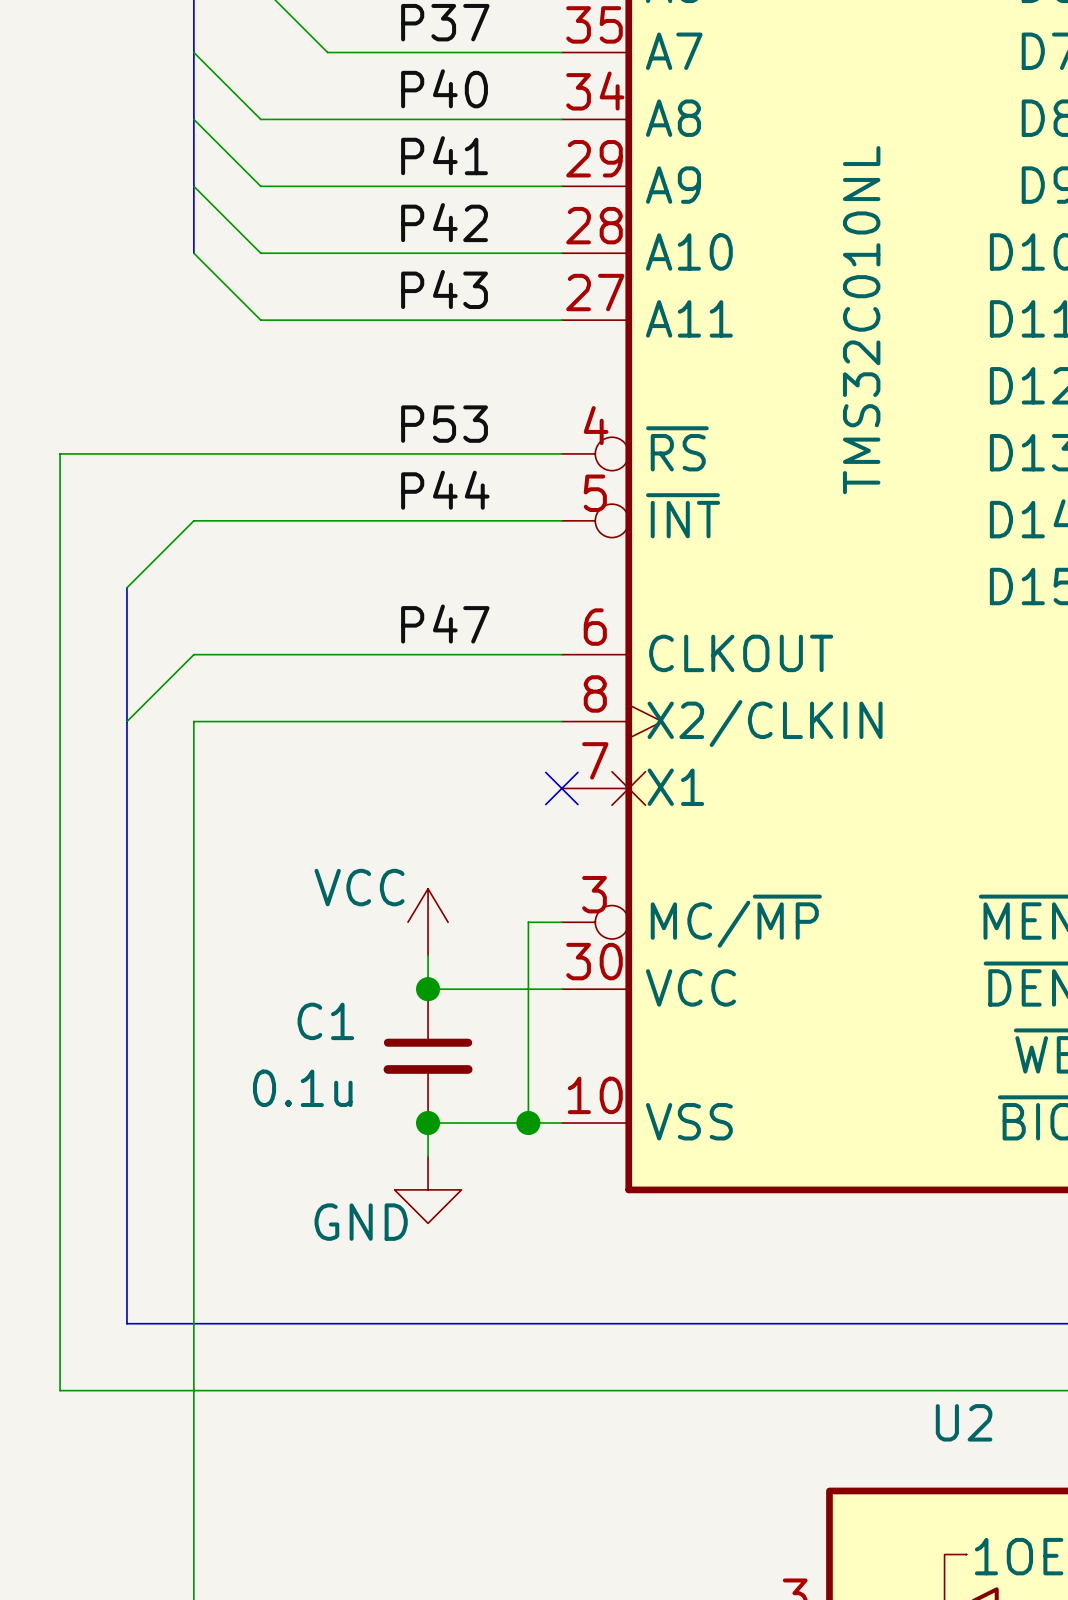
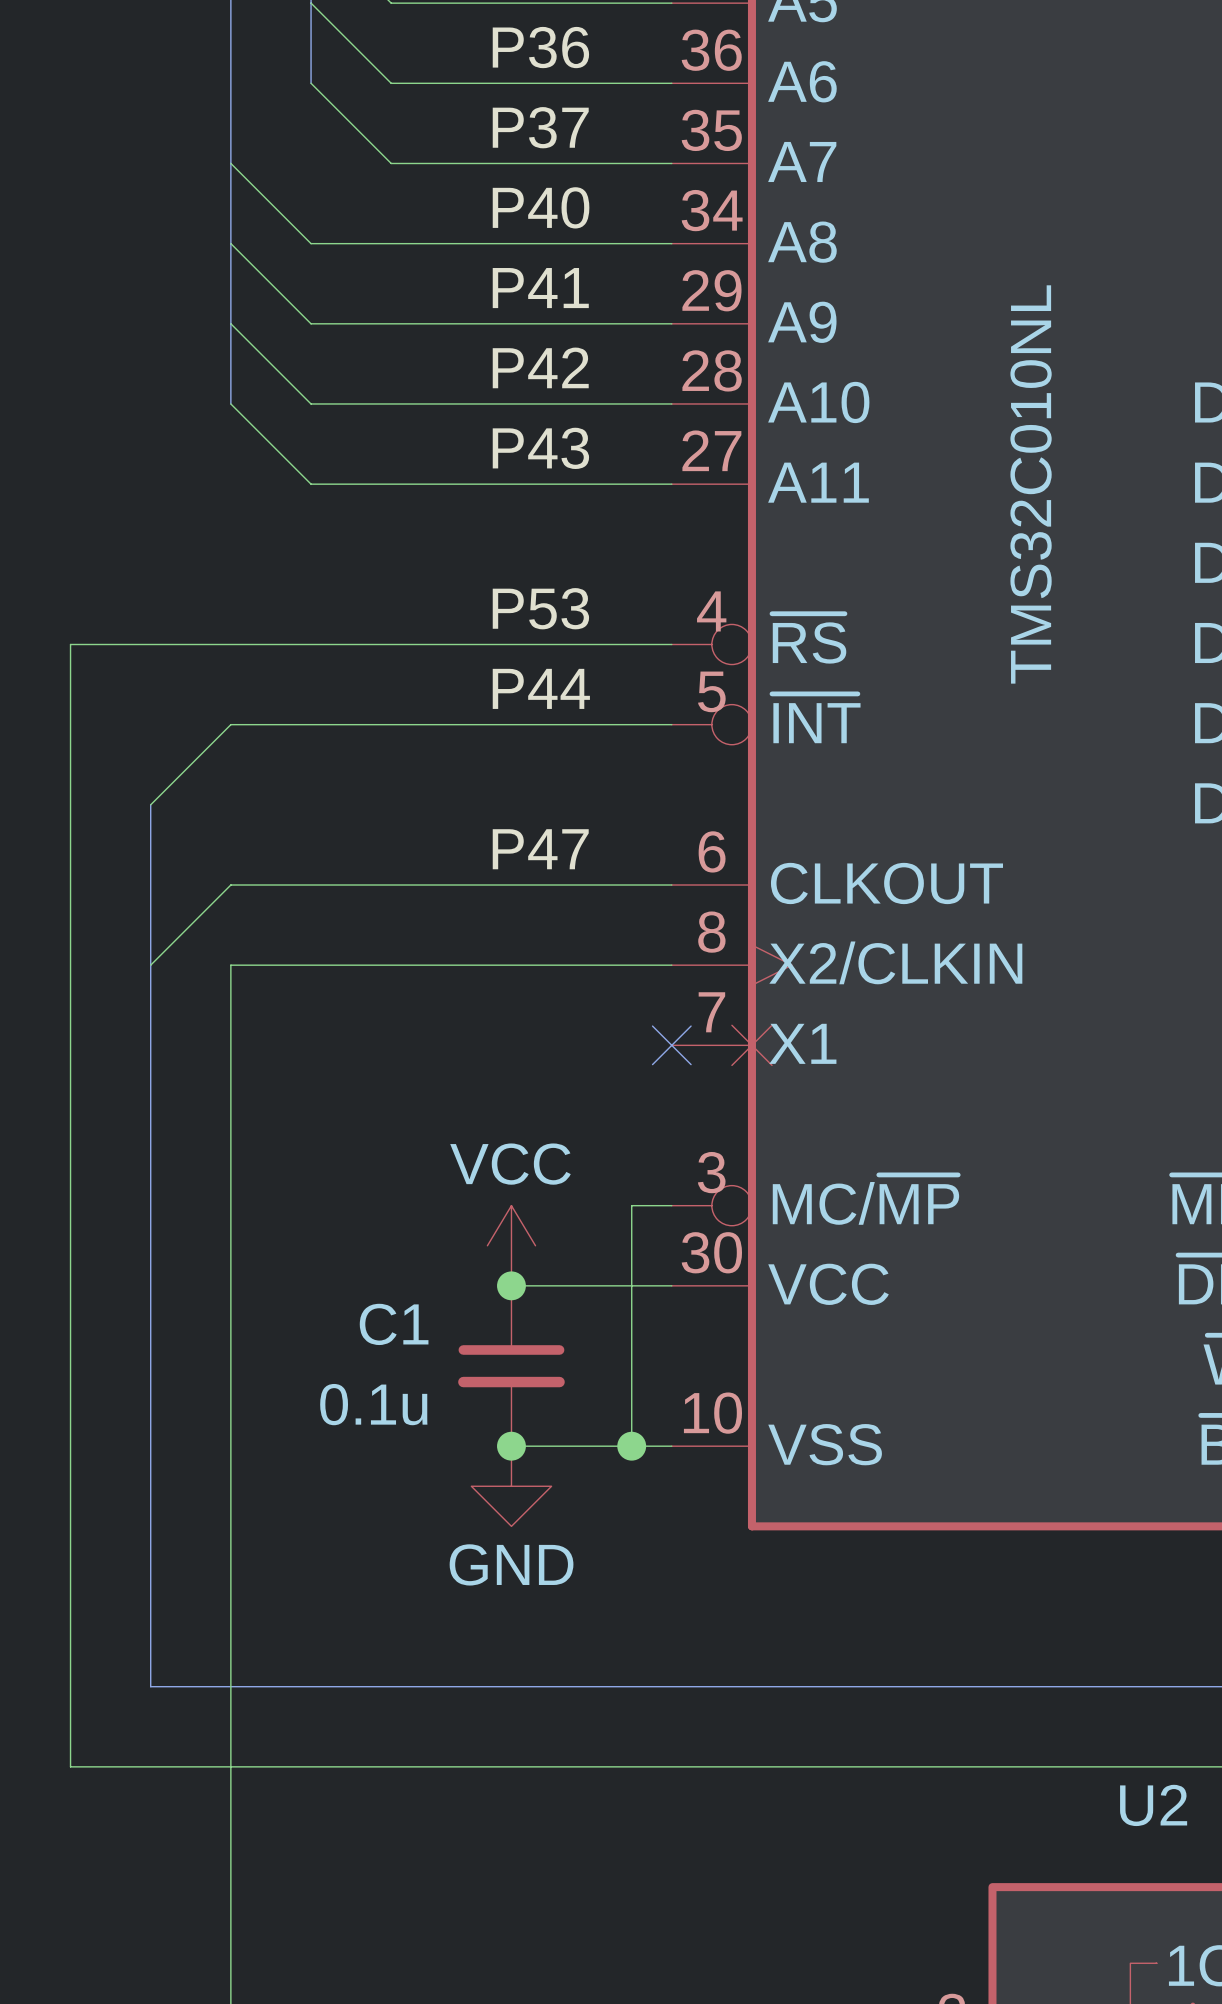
power symbol text position: VCC (359, 887) -> VCC (510, 1164)
power symbol position: VCC (428, 922) -> VCC (511, 1245)
power symbol position: GND (428, 1189) -> GND (511, 1486)
power symbol text position: GND (361, 1222) -> GND (511, 1564)

